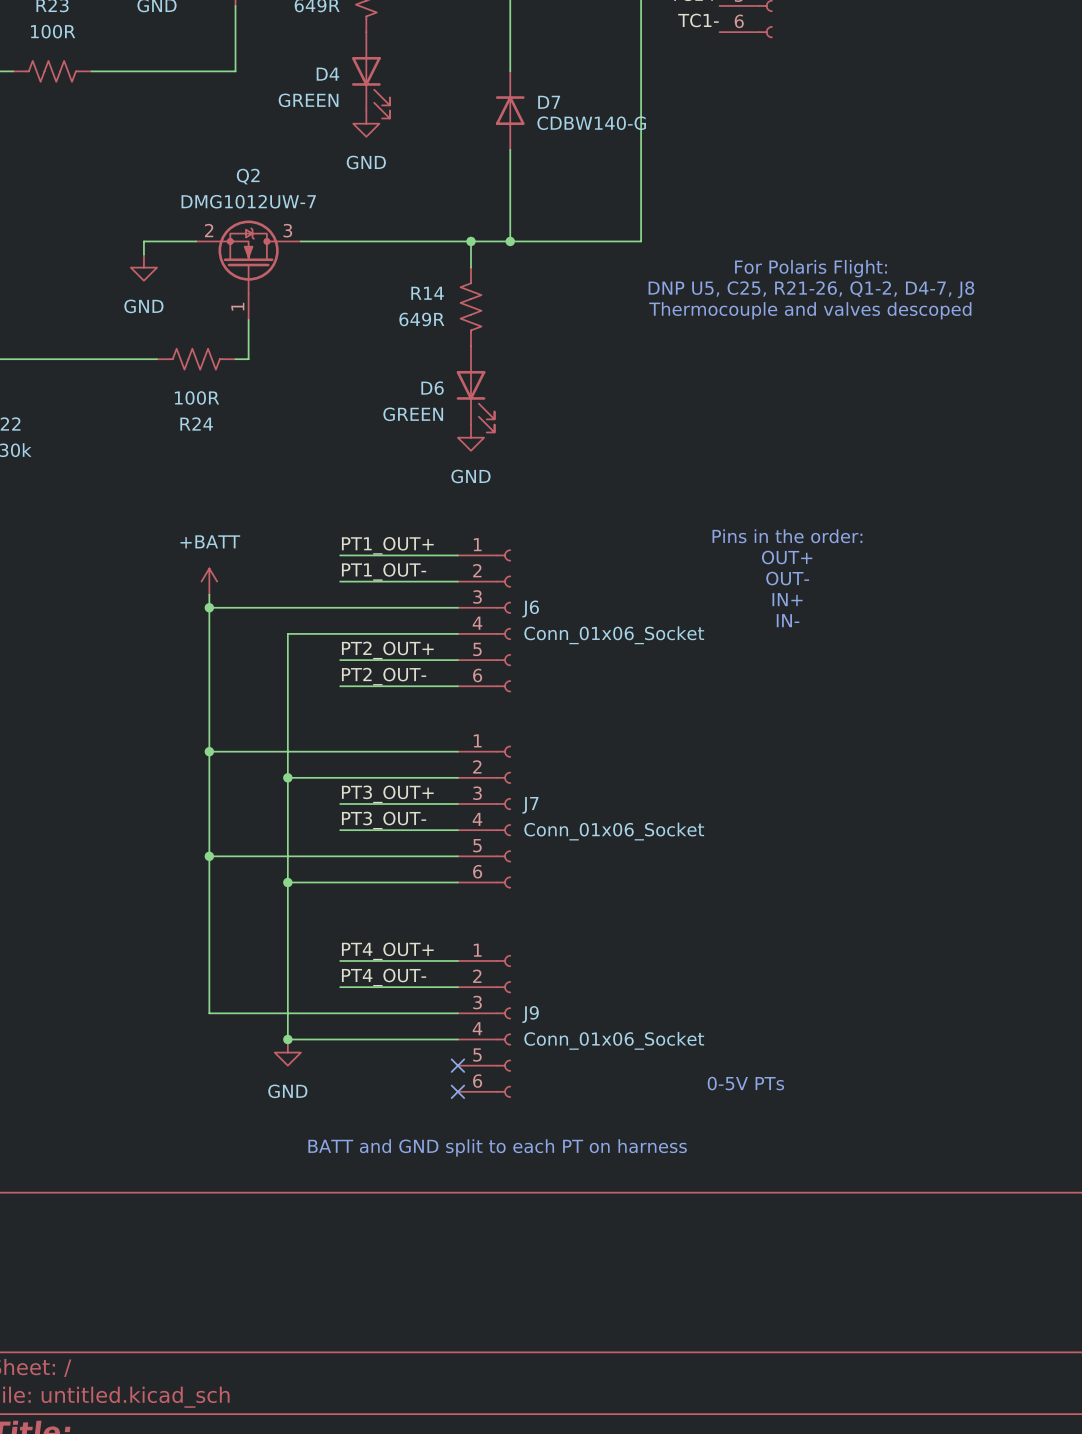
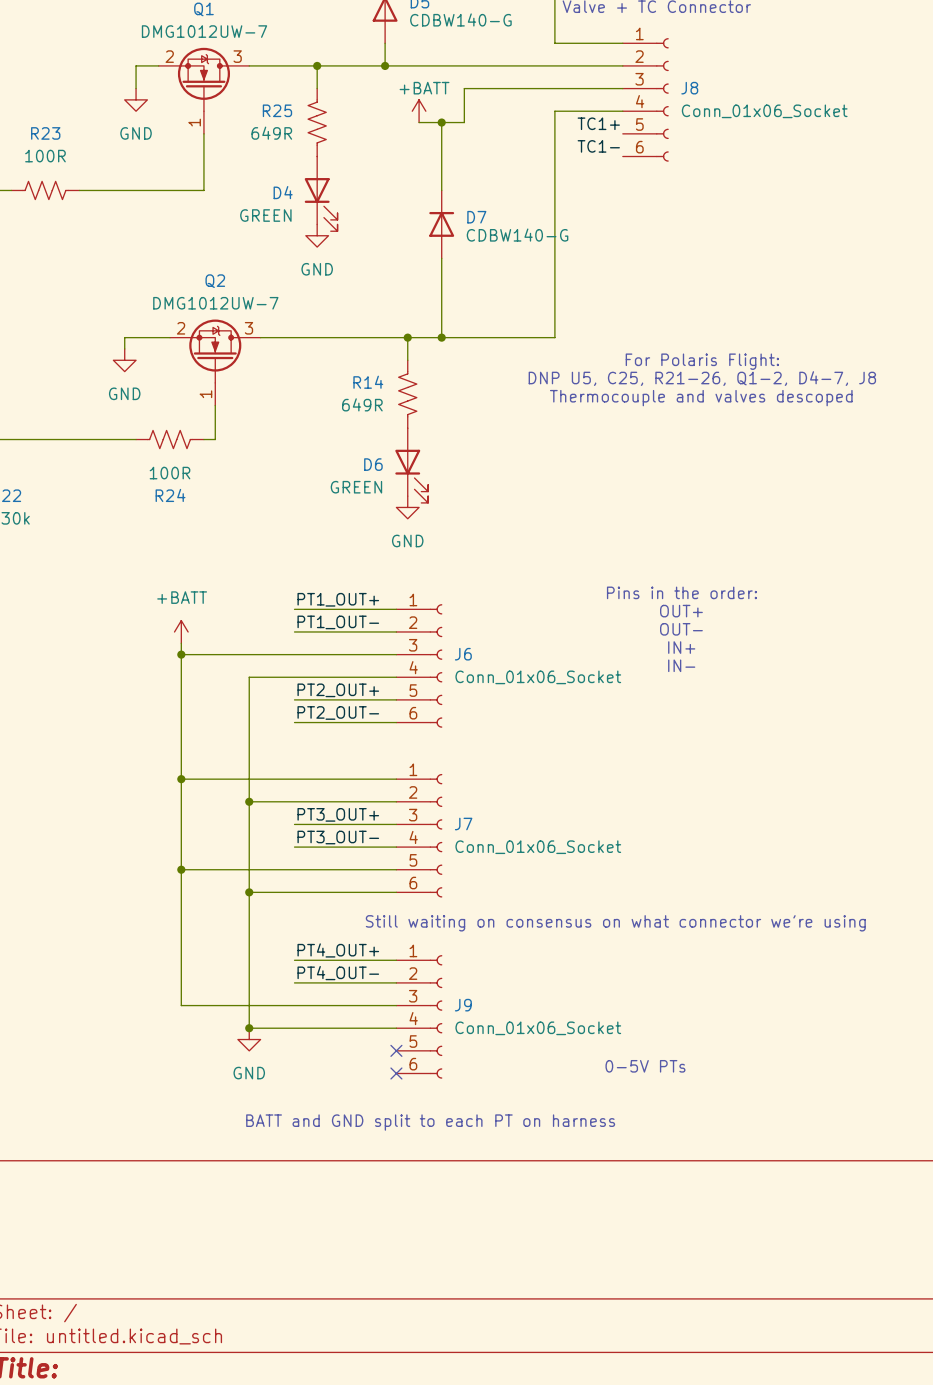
text: none -> Still waiting on consensus on what connector we're using (615, 923)

